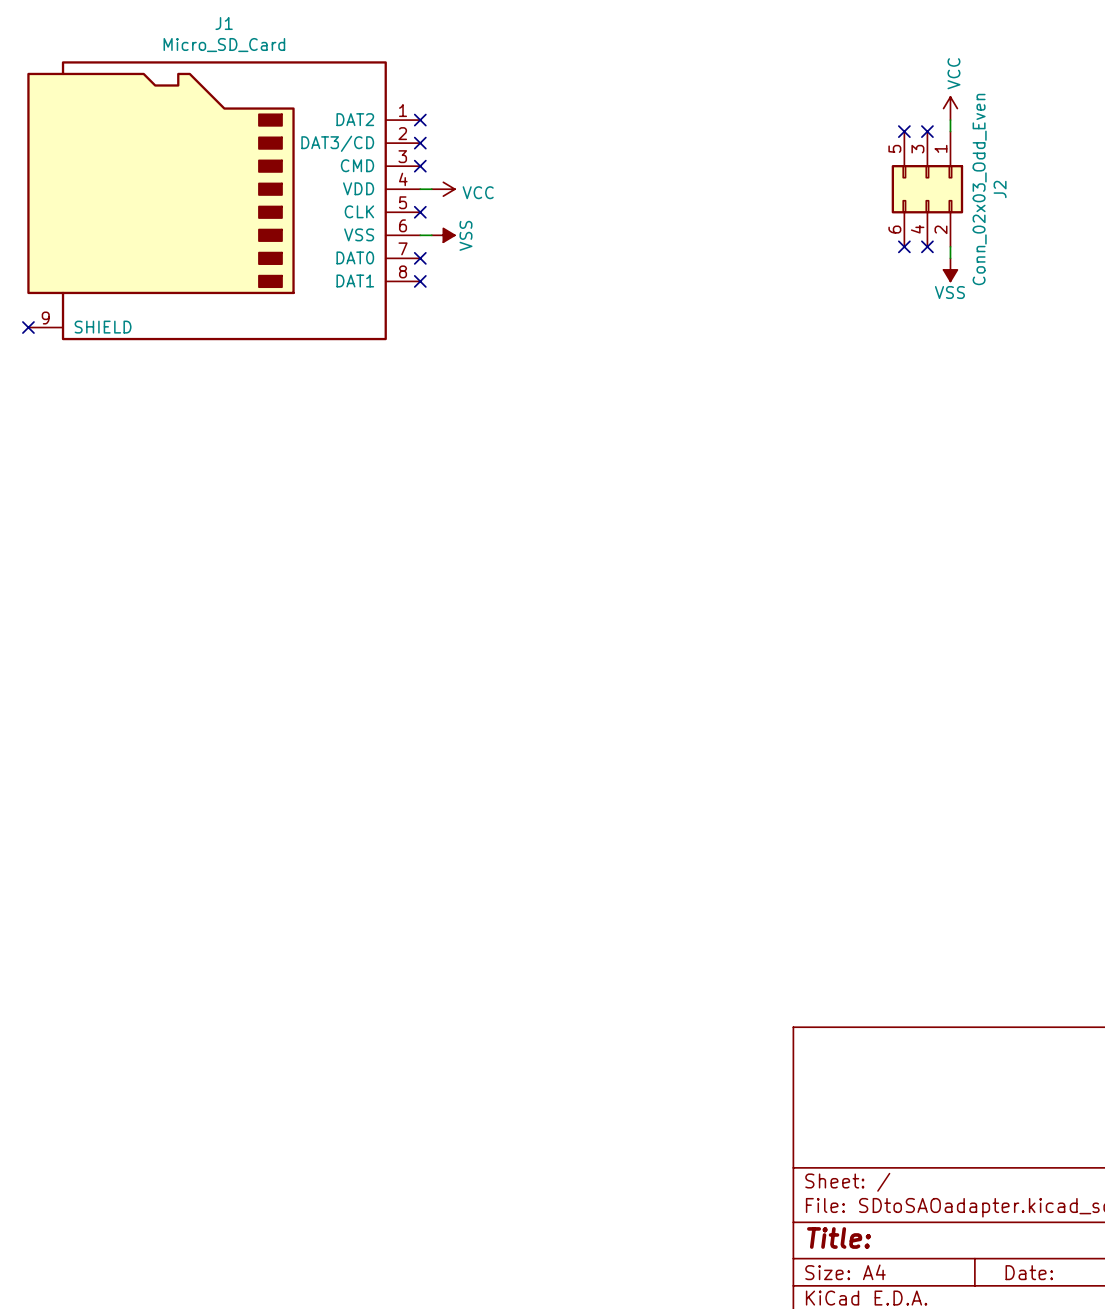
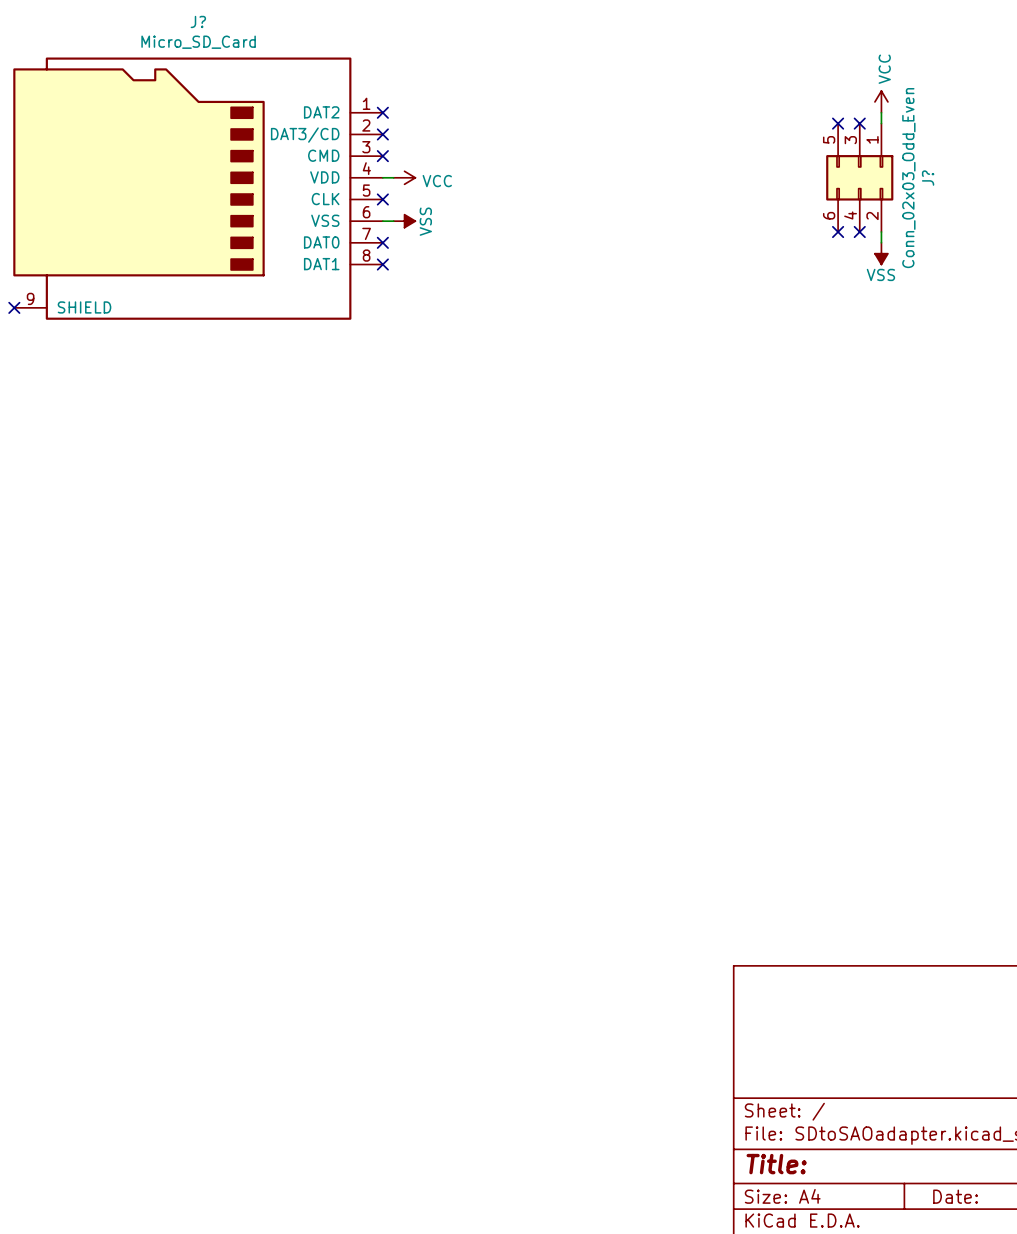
J1 name: J1 (224, 23) -> J? (198, 21)
J2 name: J2 (1000, 189) -> J? (928, 178)

